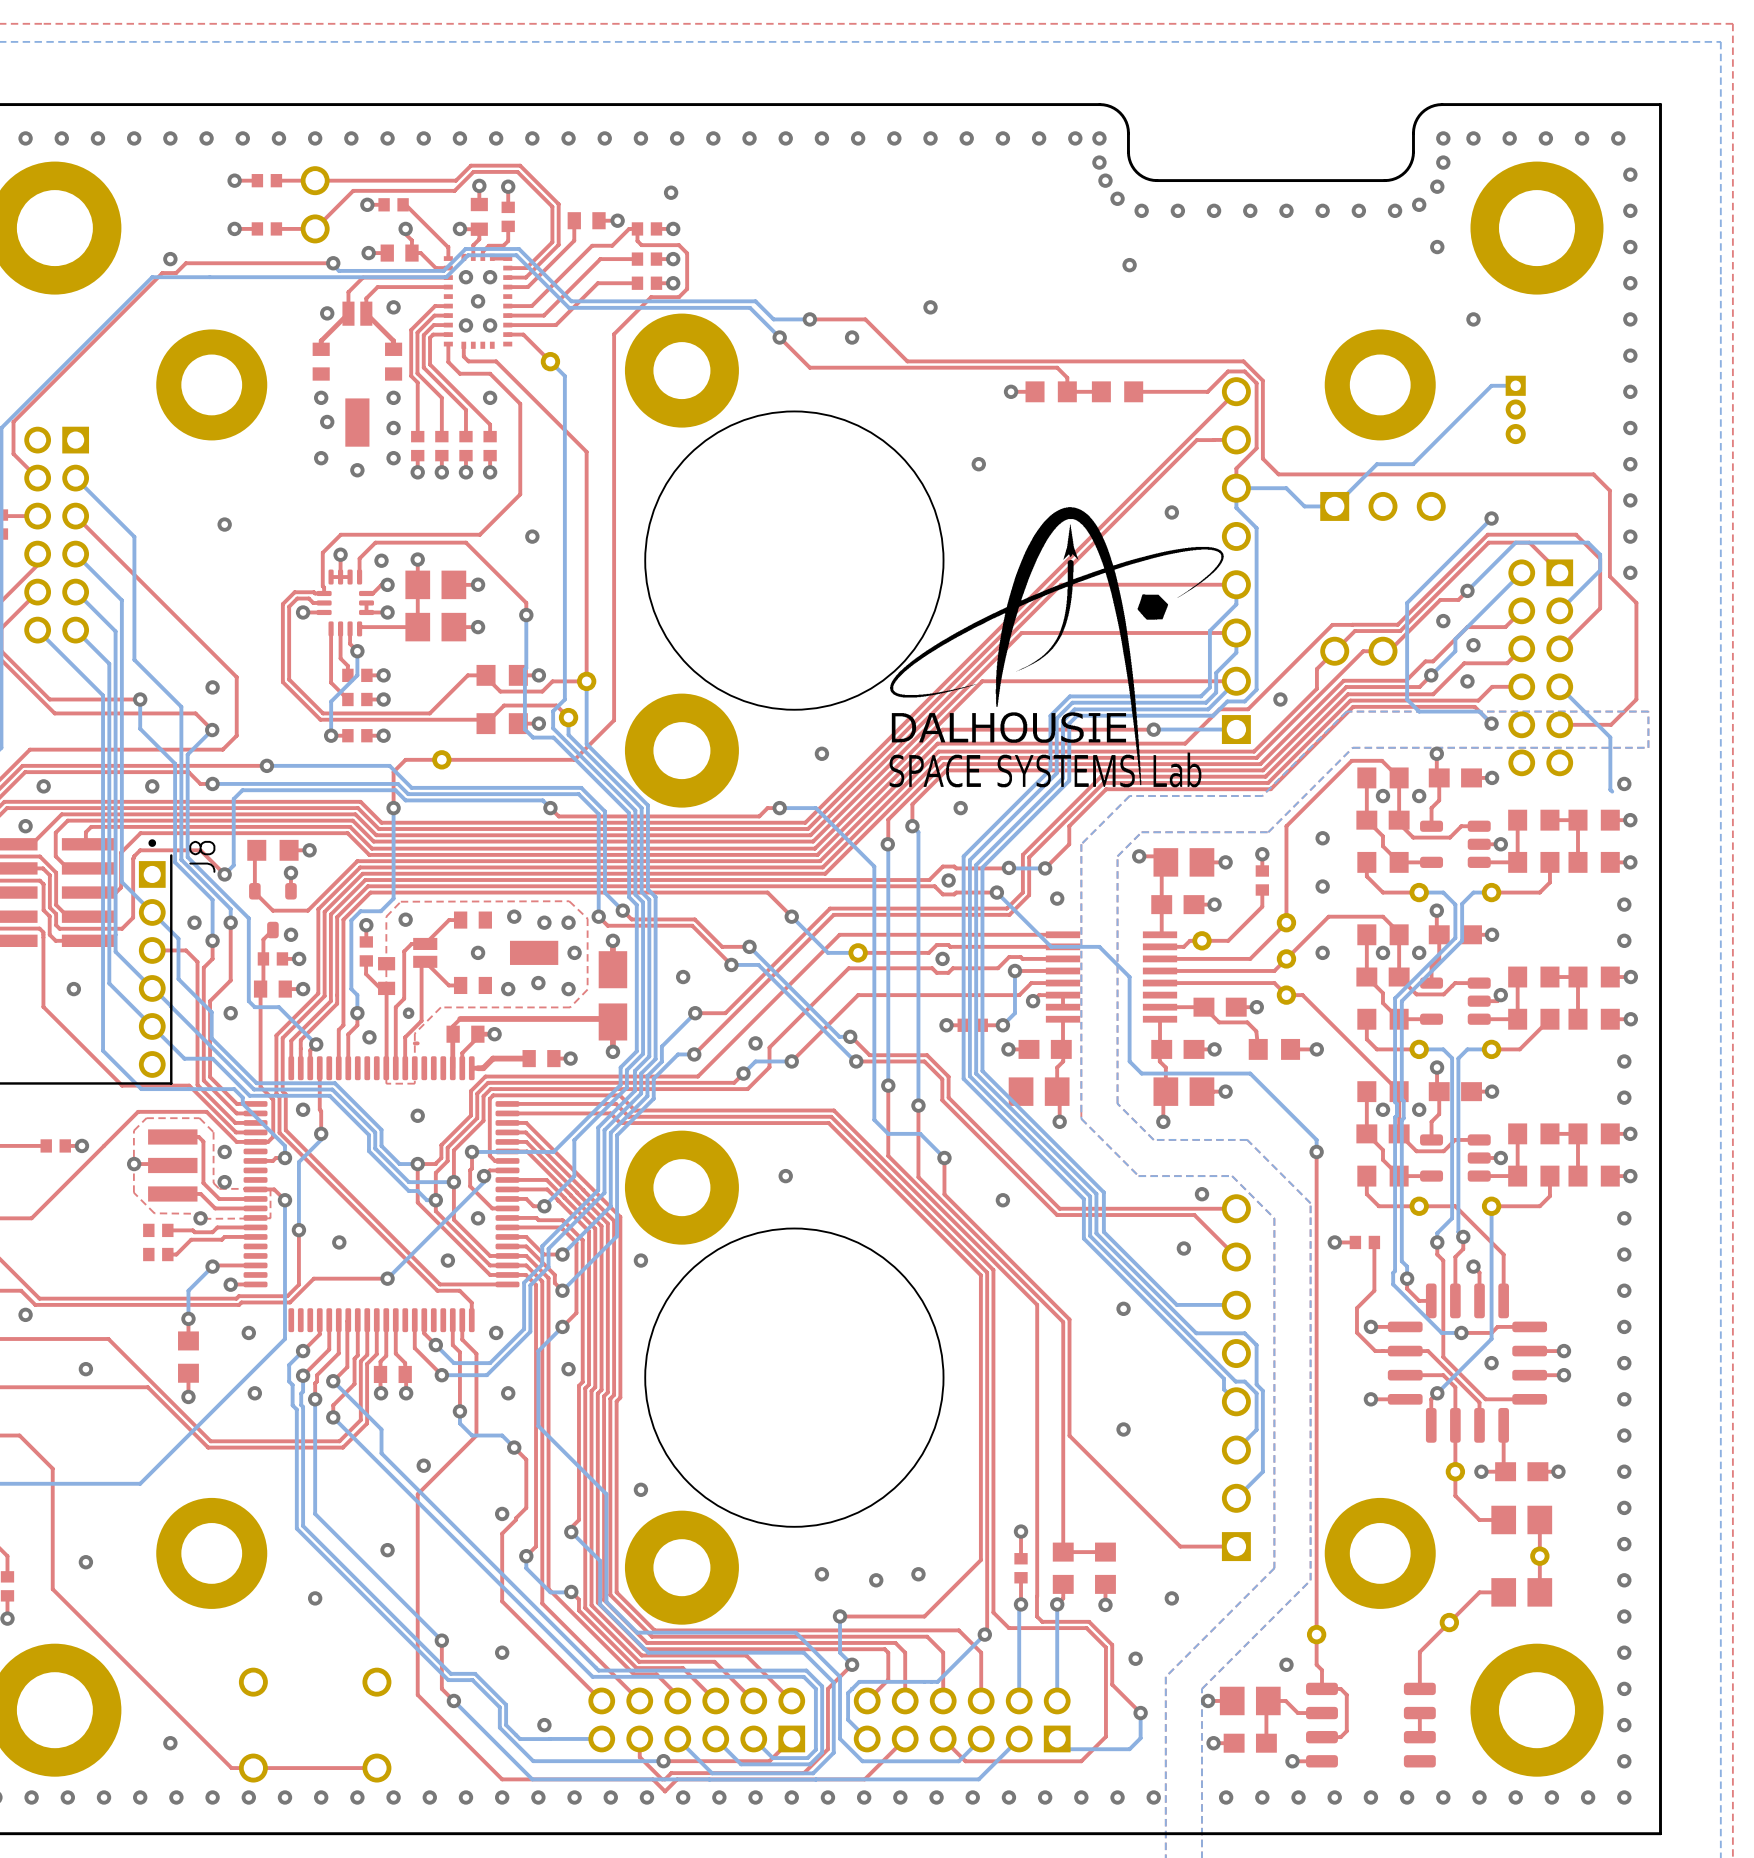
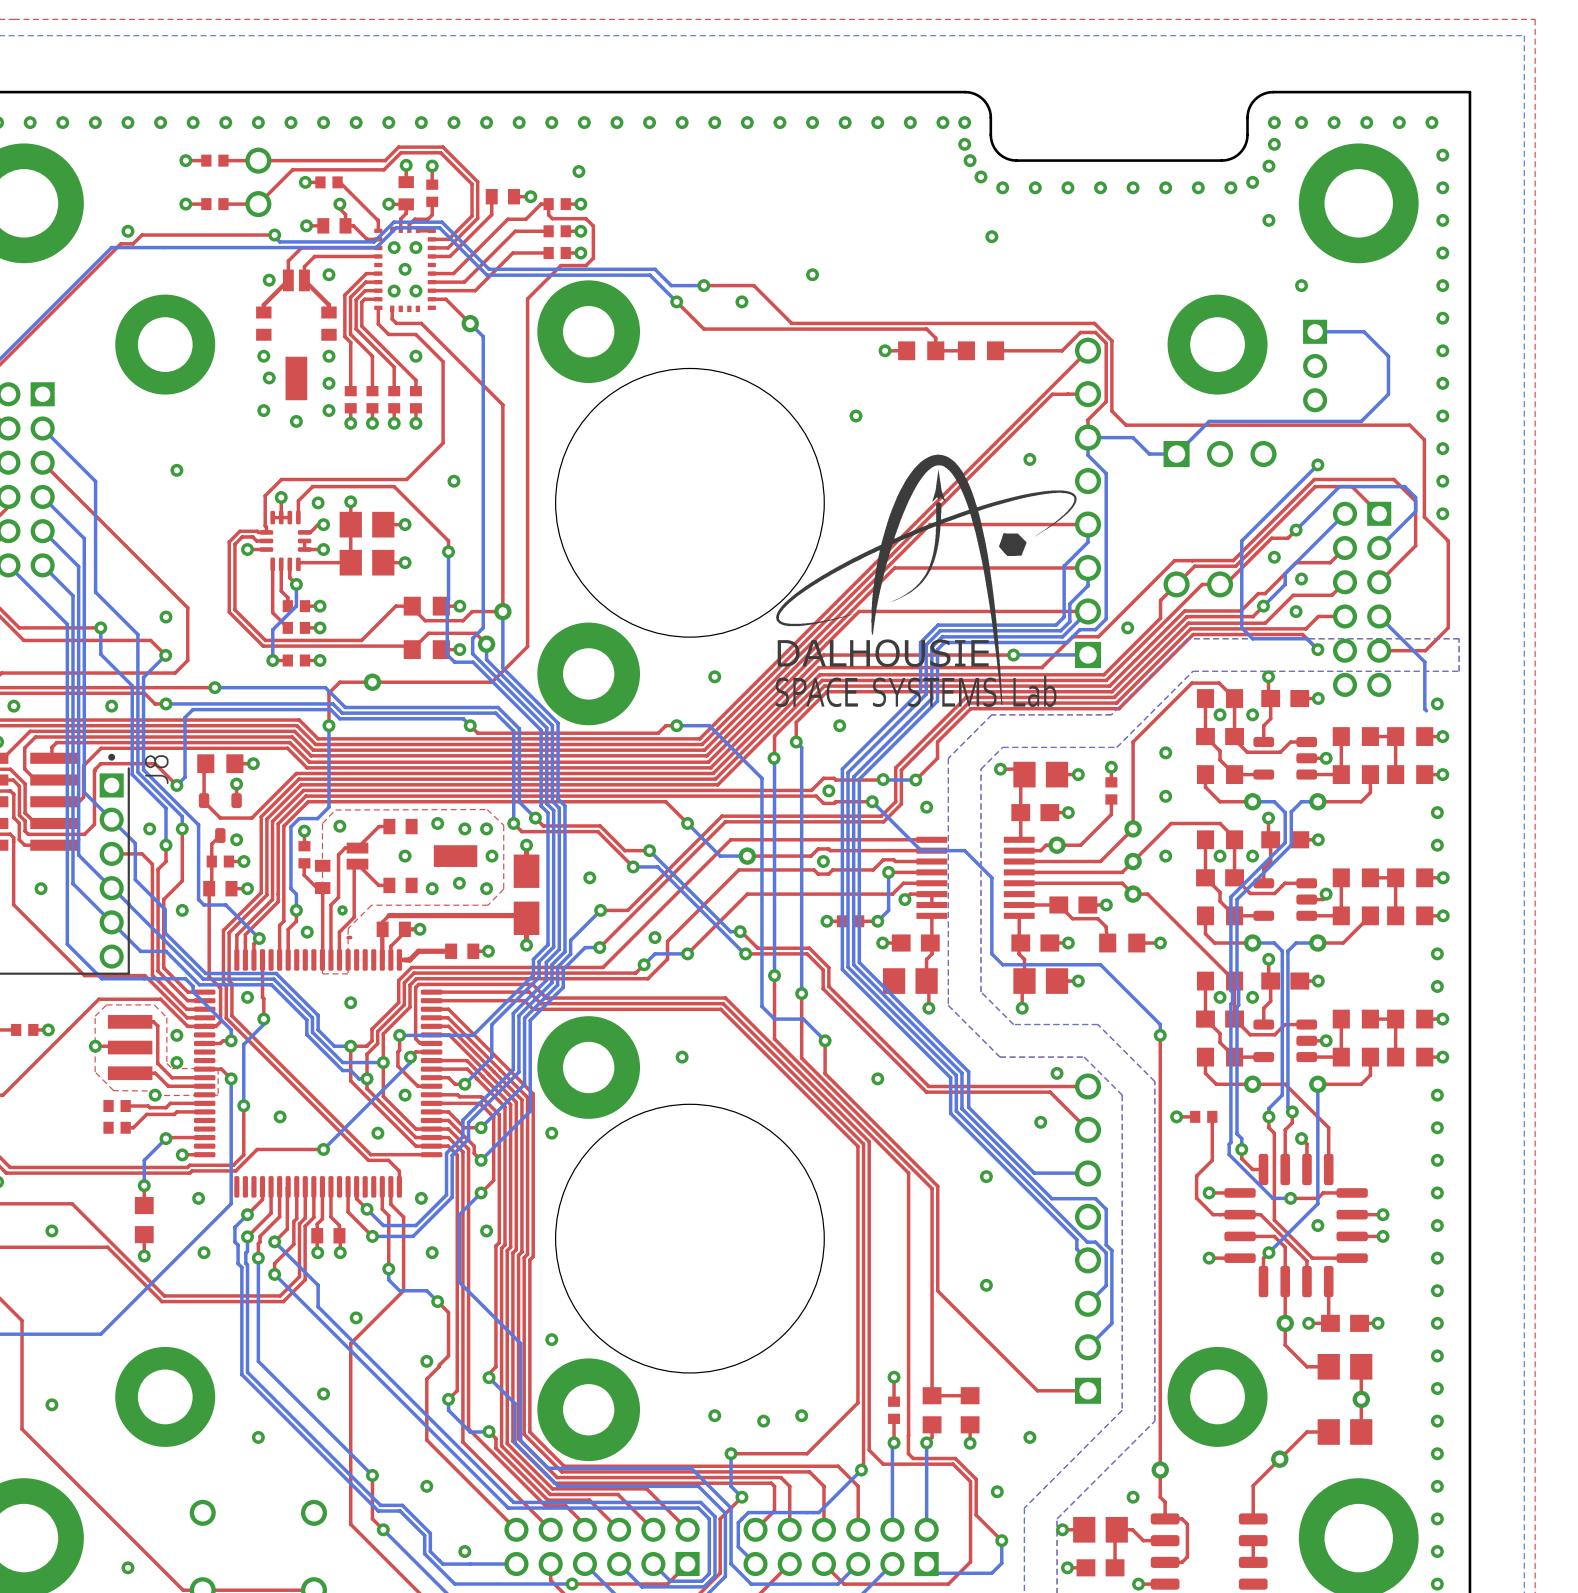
bottom track: (1515, 385) (1491, 385) (1413, 464) (1376, 464) (1370, 470) -> (1315, 331) (1364, 331) (1388, 356) (1388, 394) (1361, 421) (1209, 421)
part: none -> (1315, 366)
part: (1515, 409) -> none

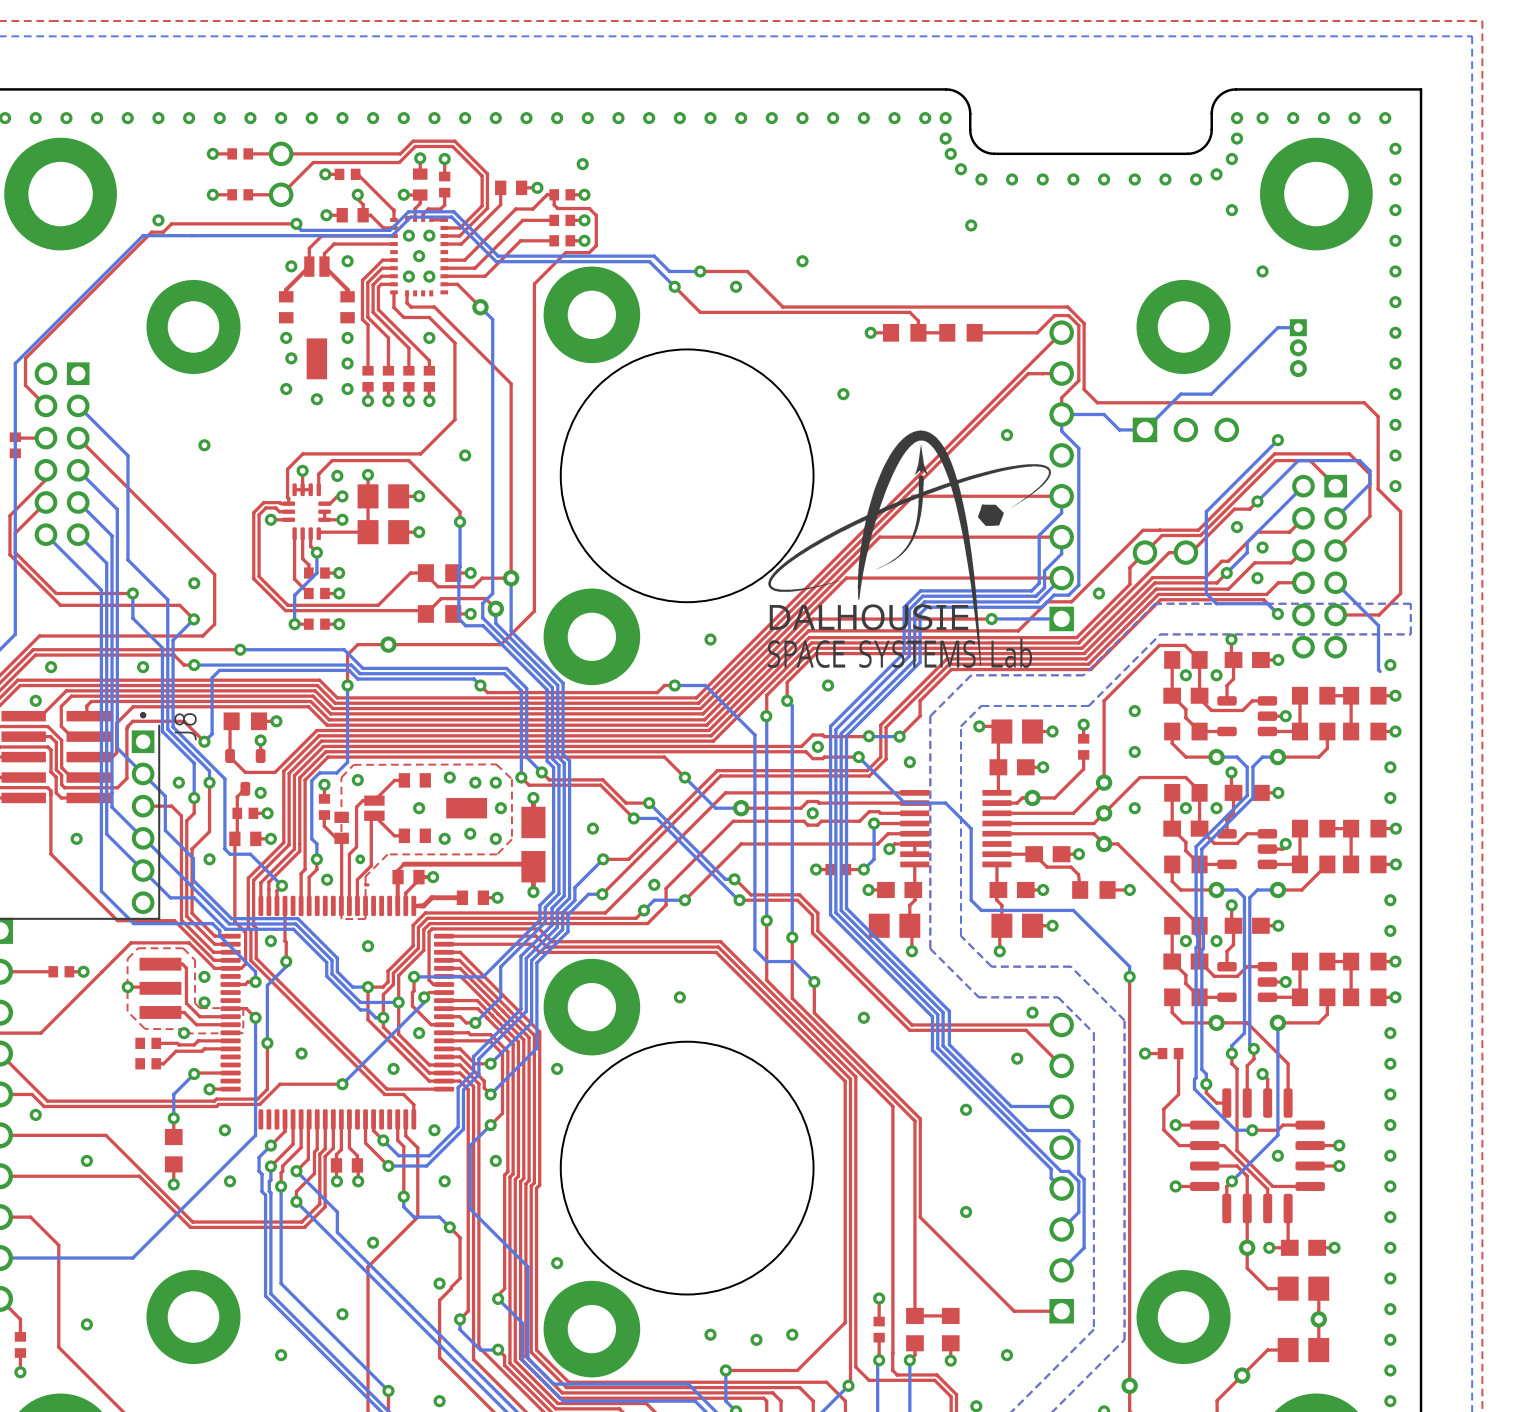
bottom track: (1315, 331) (1364, 331) (1388, 356) (1388, 394) (1361, 421) (1209, 421) -> (1298, 327) (1277, 327) (1211, 394) (1180, 394) (1175, 399)
part: (1315, 366) -> none
part: none -> (1298, 348)

